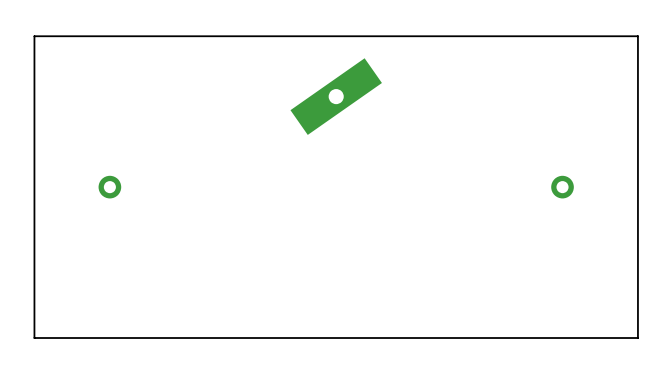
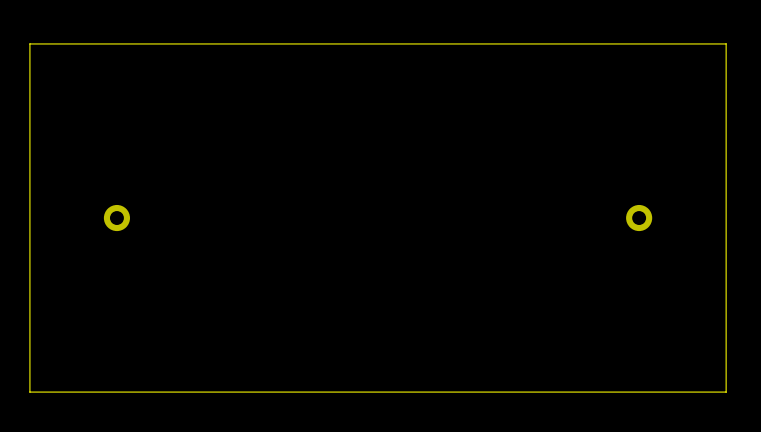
part: (336, 96) -> none

